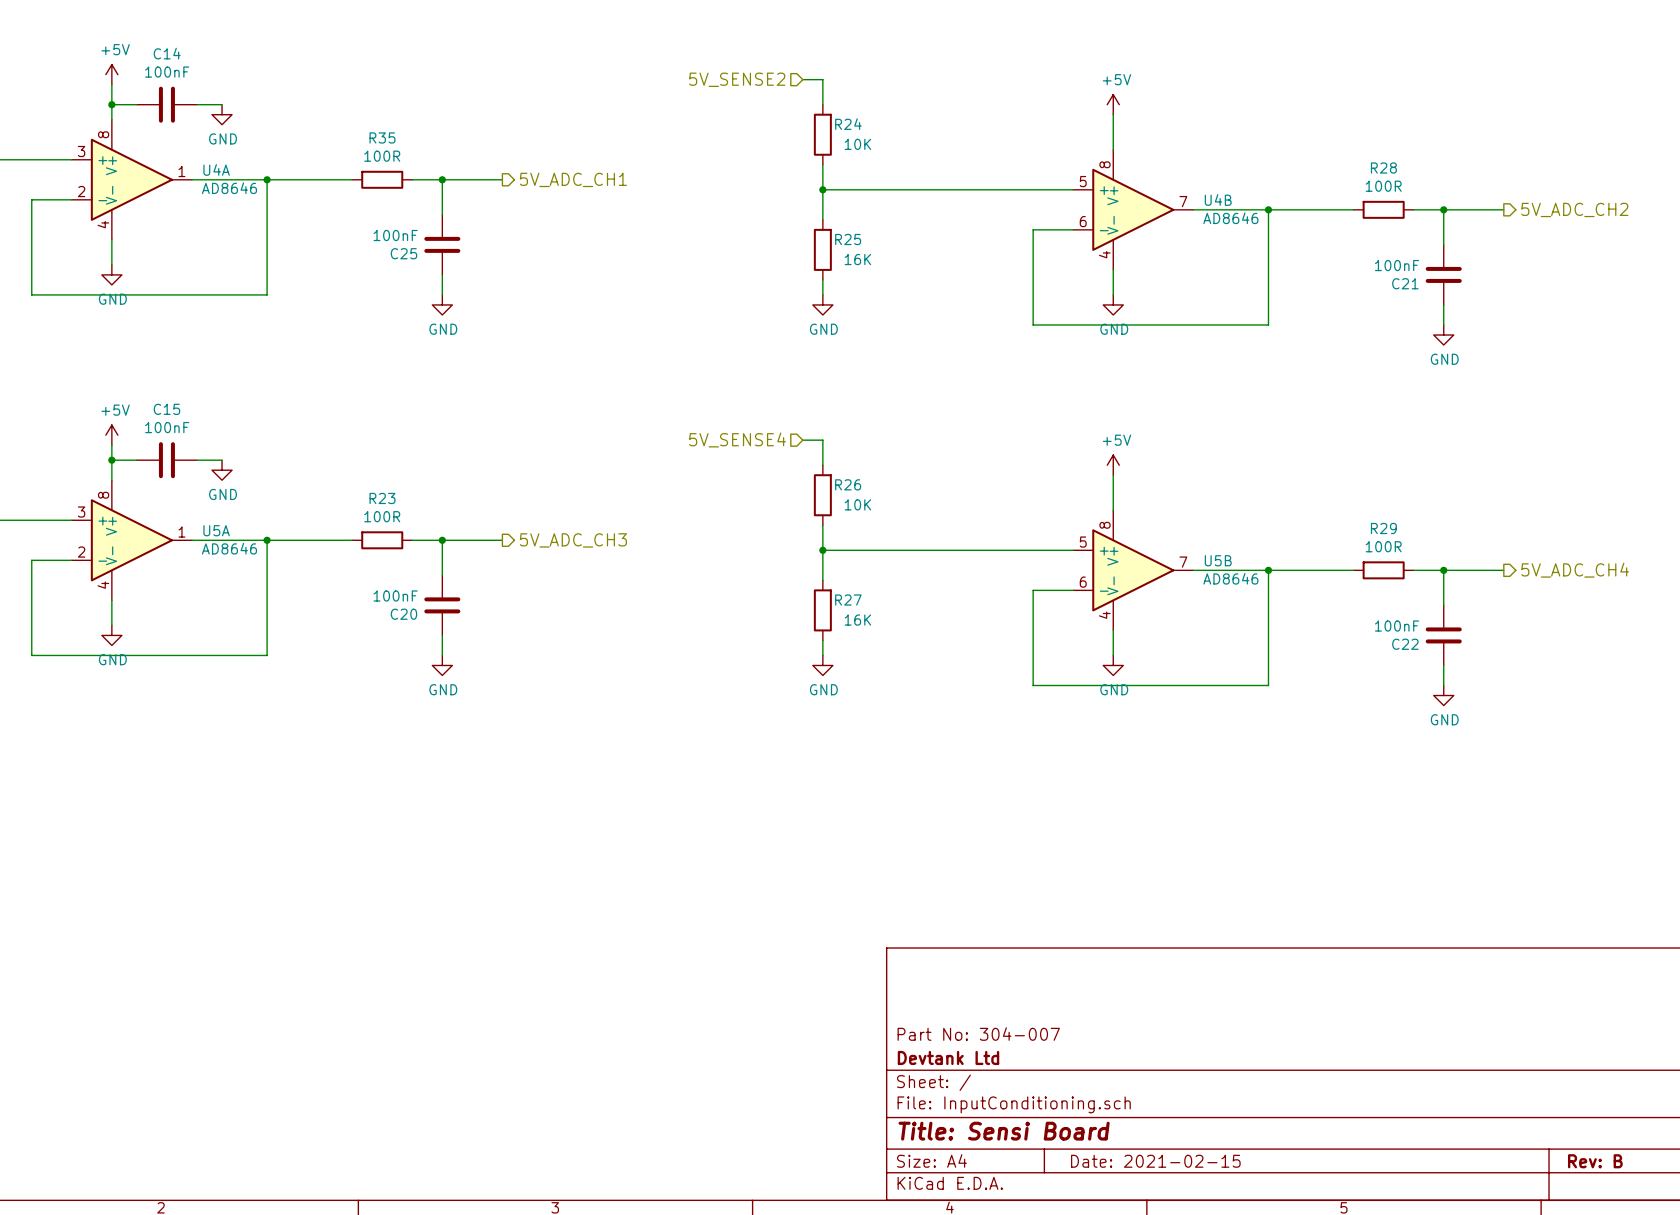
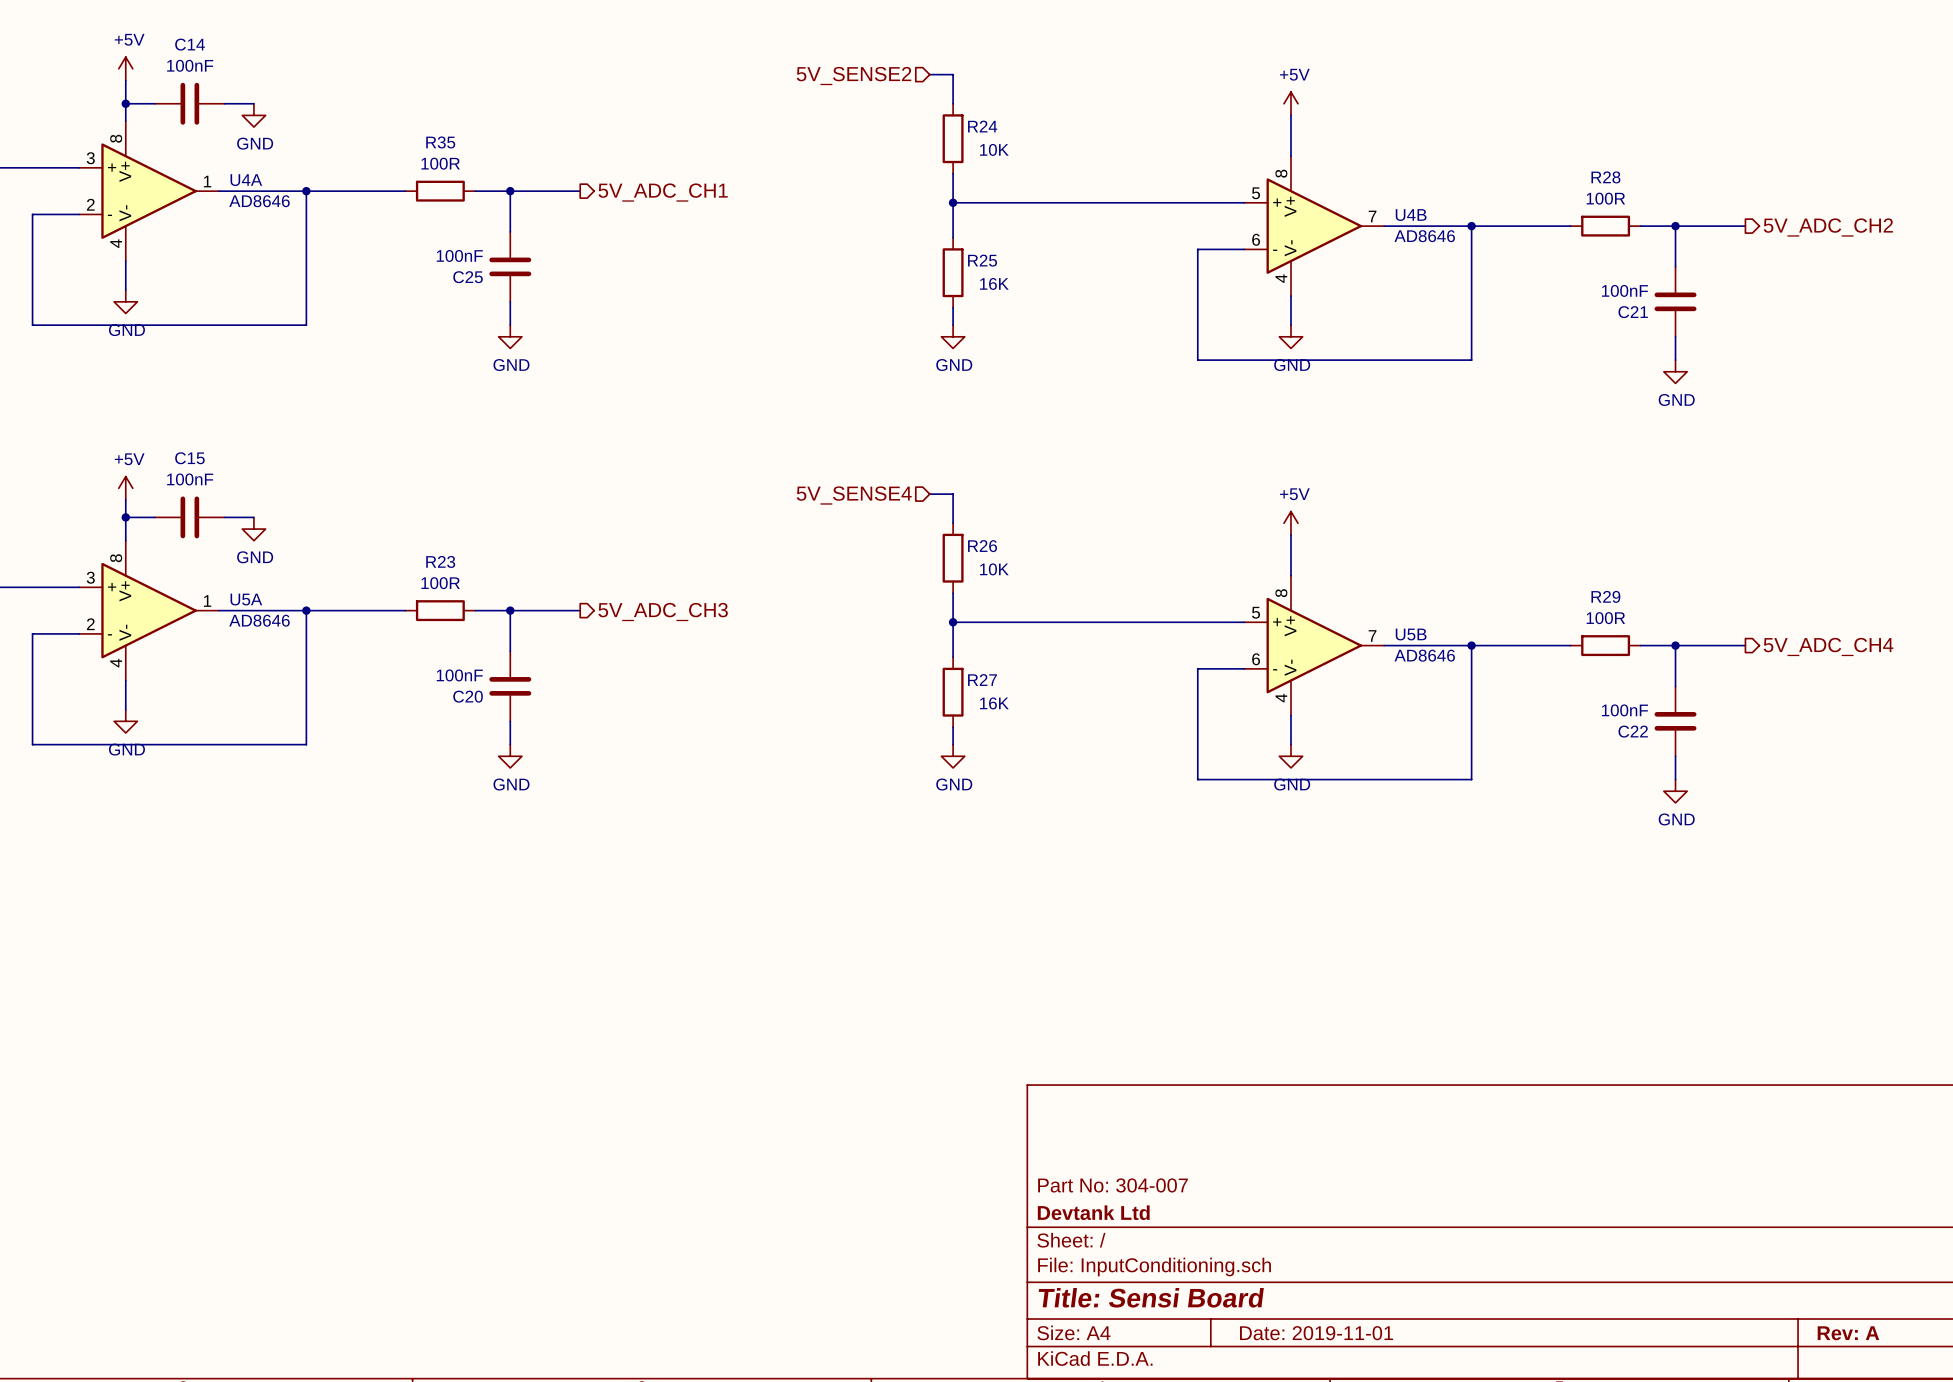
title block: Date: 2021-02-15 (1155, 1161) -> Date: 2019-11-01 (1316, 1333)
title block: Rev: B (1595, 1161) -> Rev: A (1848, 1333)

